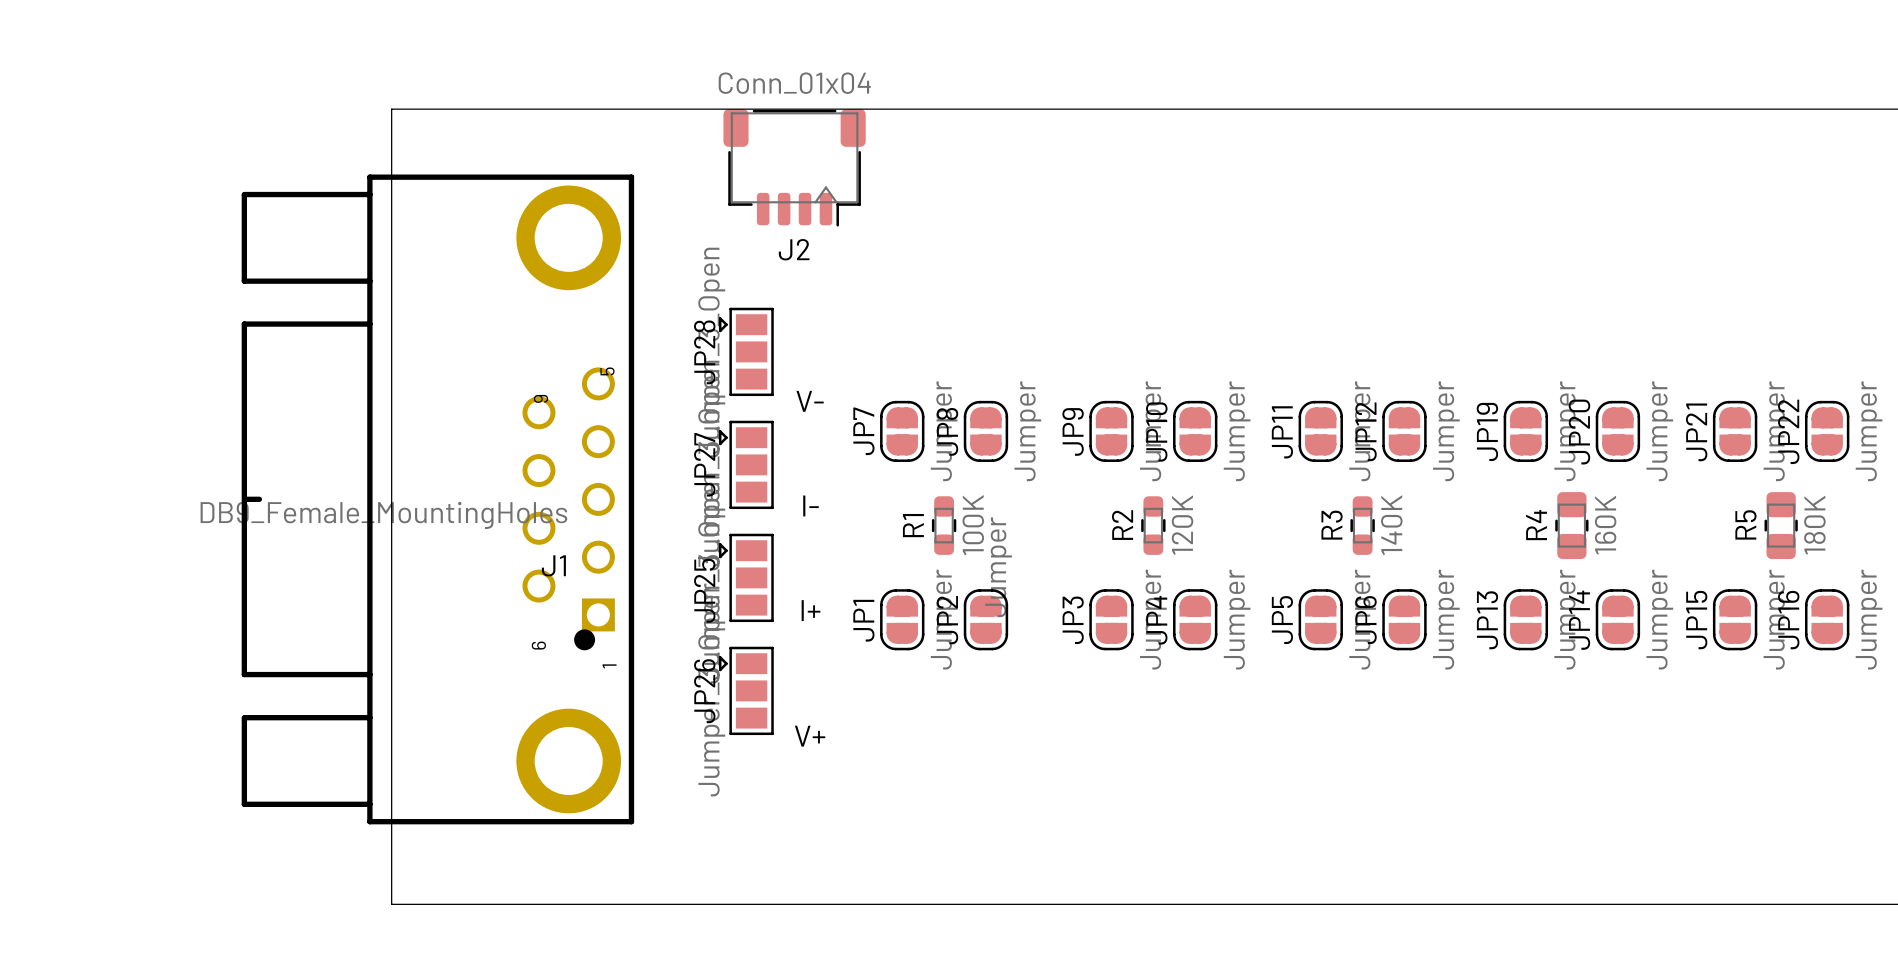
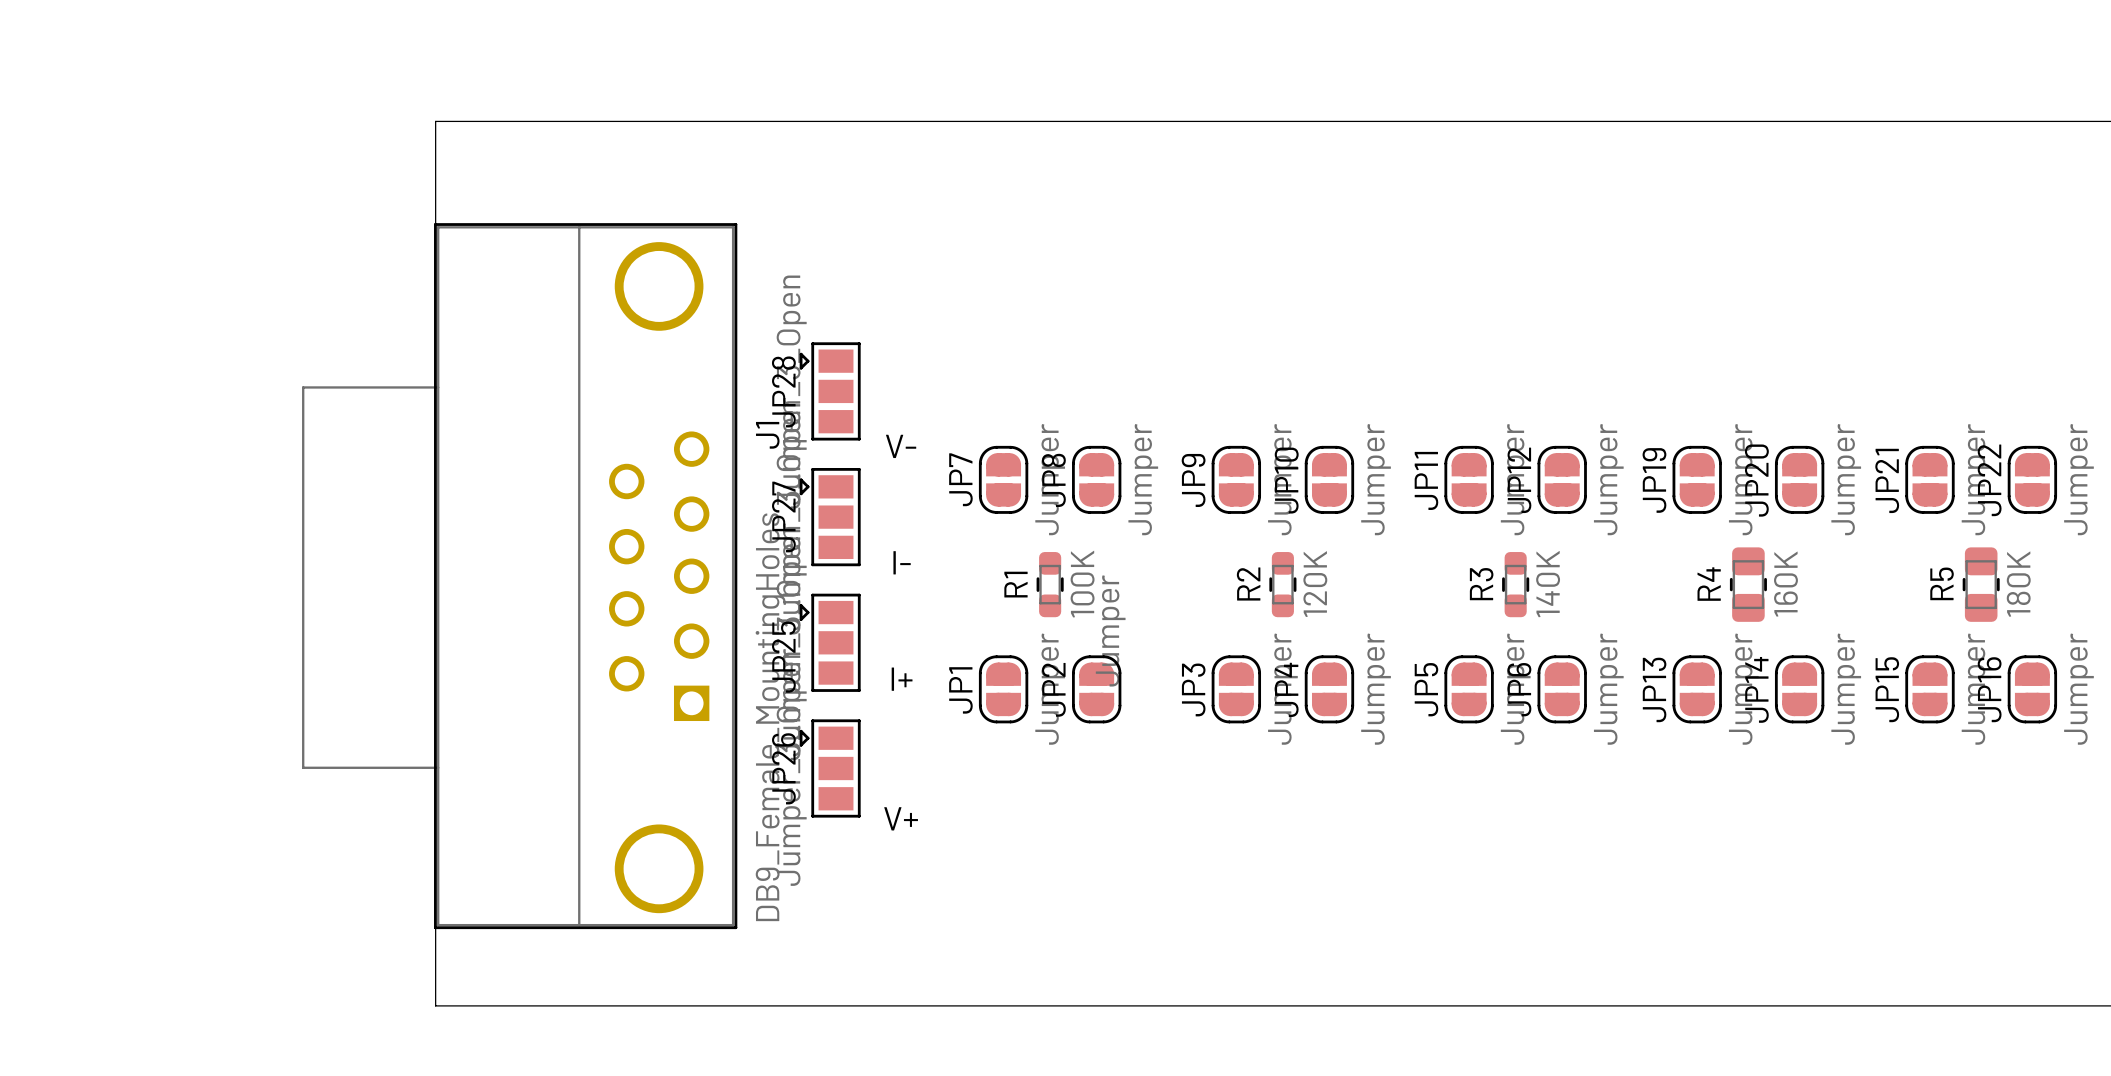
J2: Conn_01x04 (794, 167) -> none
J1 footprint: [241, 174, 635, 825] -> [302, 223, 738, 930]
J1 value position: DB9_Female_MountingHoles (383, 515) -> DB9_Female_MountingHoles (770, 717)
J1 name position: J1 (553, 565) -> J1 (767, 435)

